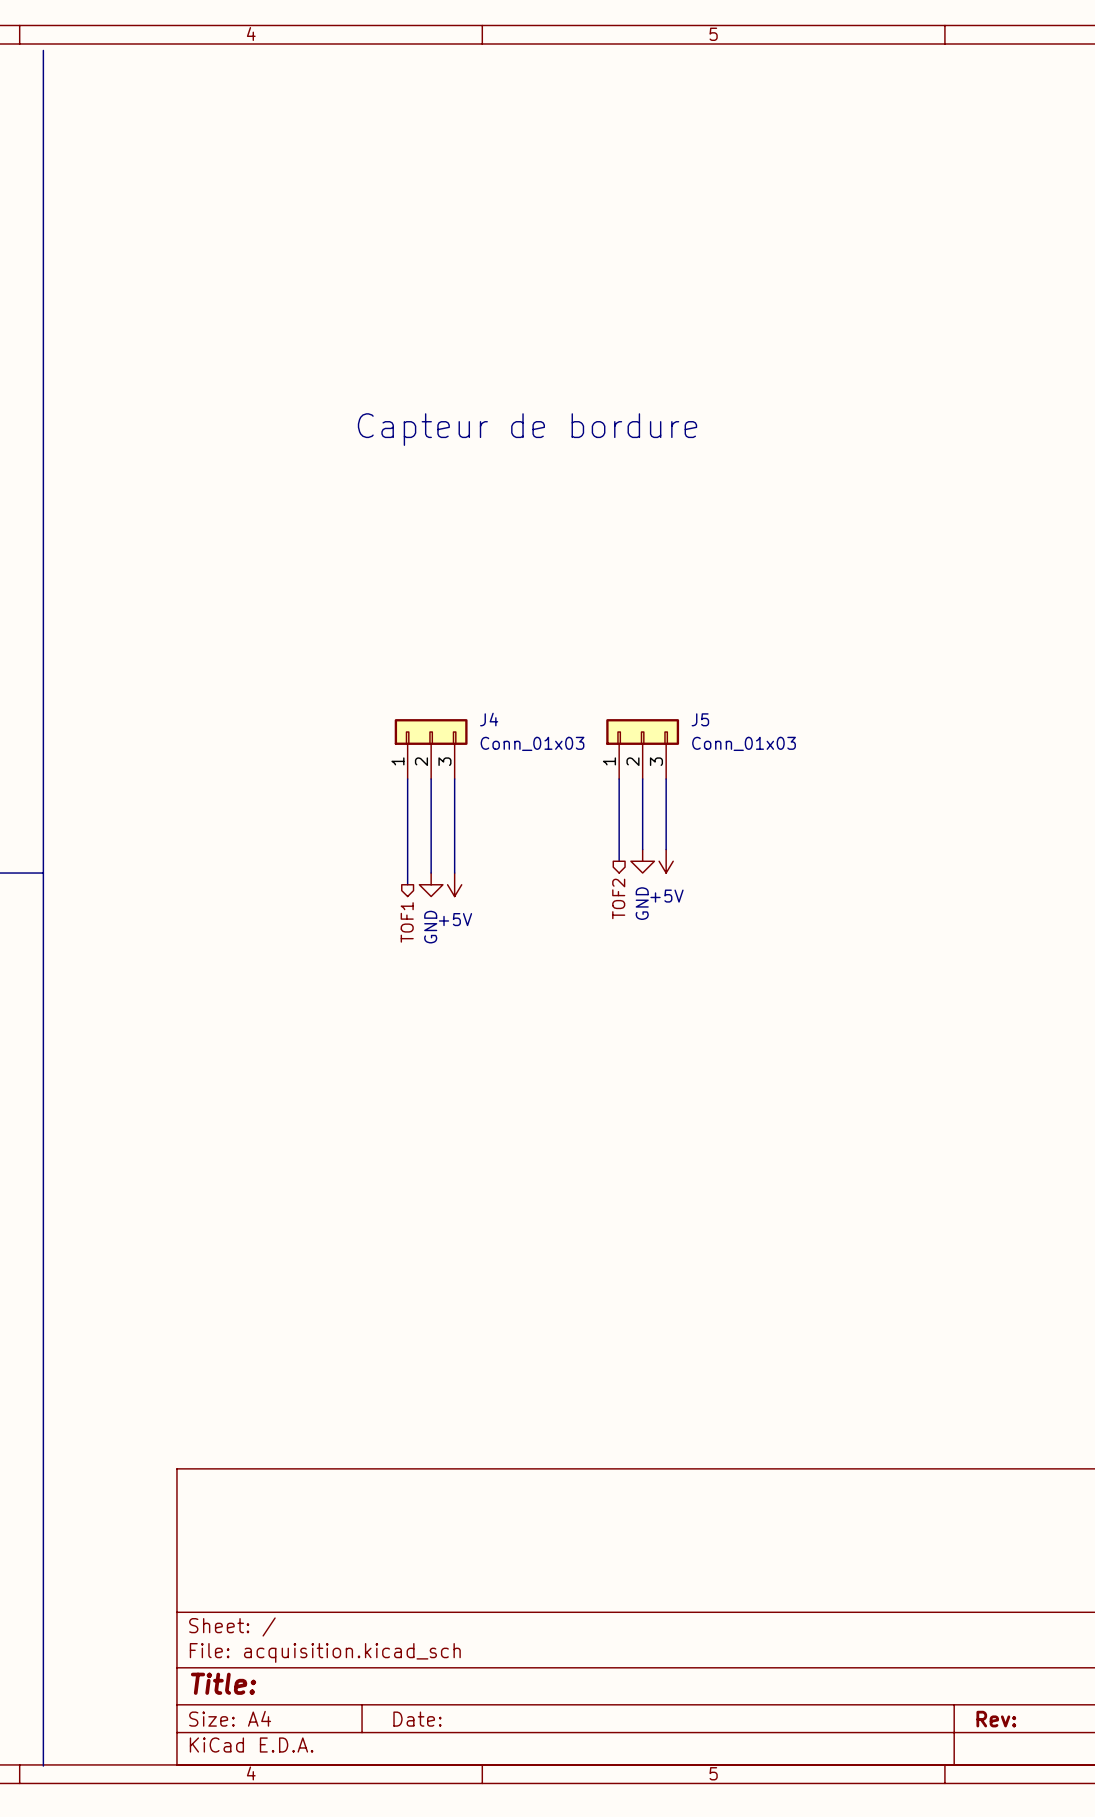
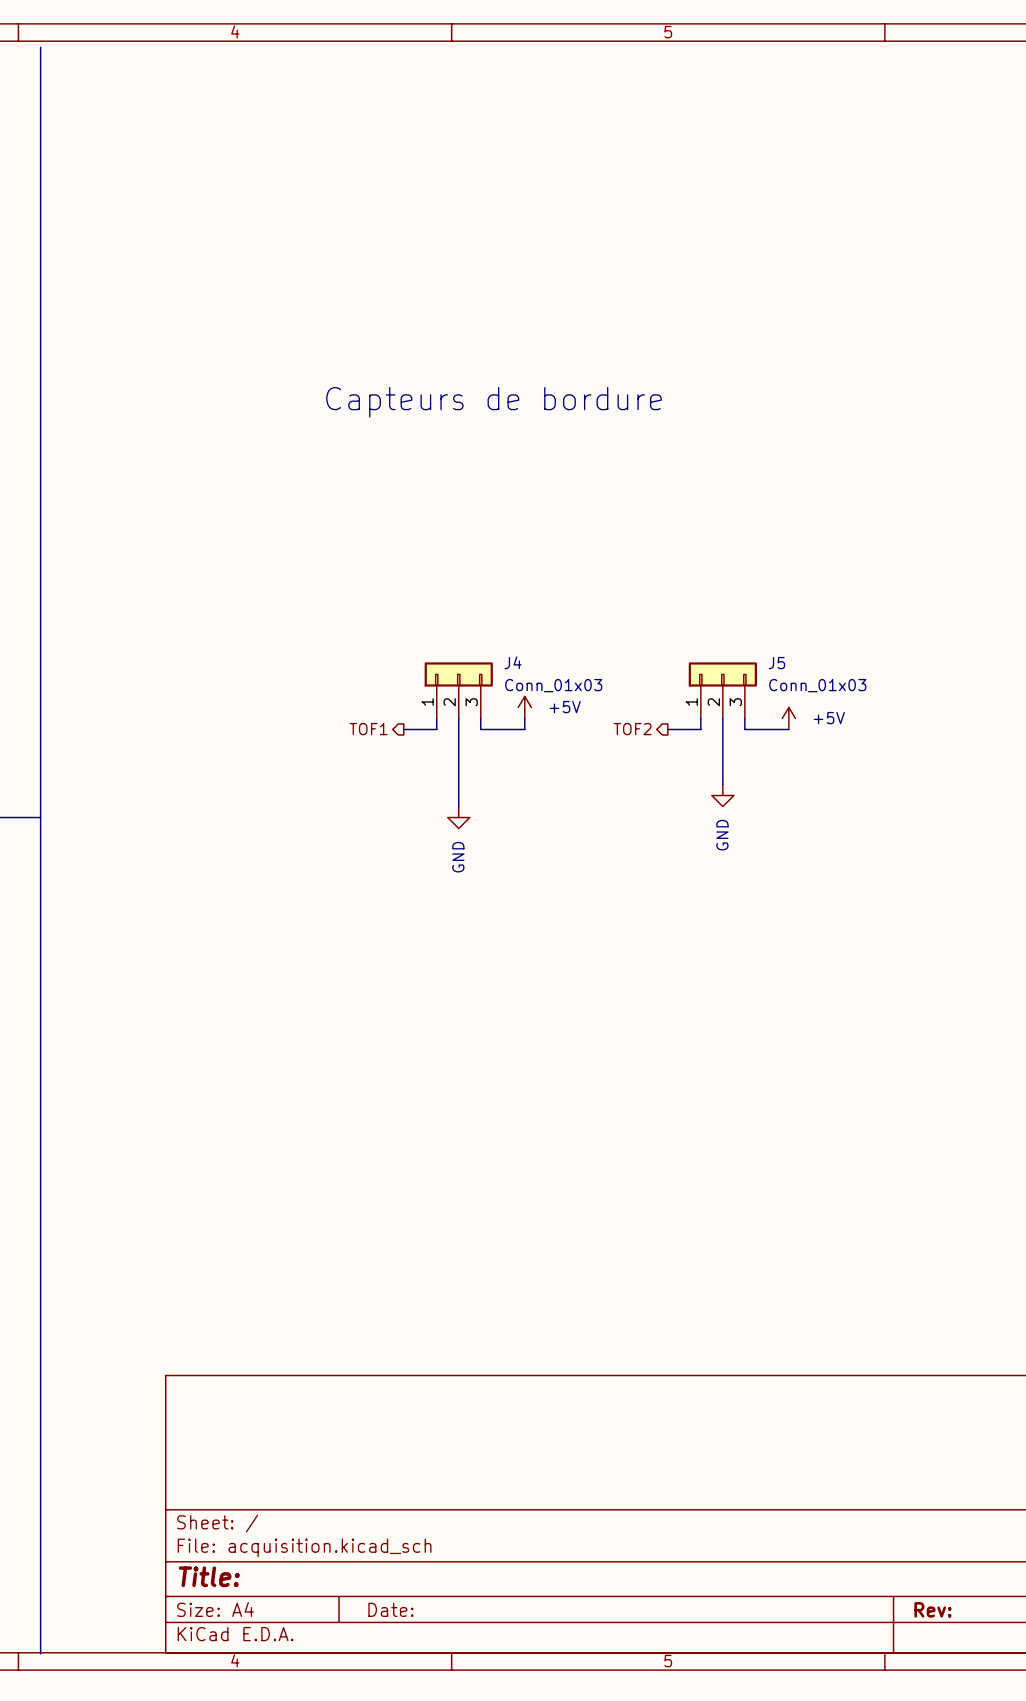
text: Capteur de bordure (527, 429) -> Capteurs de bordure (493, 402)
J4 position: (431, 749) -> (458, 690)
J5 position: (642, 749) -> (722, 690)
power symbol: none -> +5V (524, 707)
wire: none -> (480, 718) (480, 729) (524, 729) (524, 718)
wire: none -> (700, 718) (700, 729) (667, 729)
wire: none -> (744, 718) (744, 729) (788, 729)
power symbol: none -> +5V (788, 718)
wire: (407, 779) (407, 884) -> none
wire: (431, 779) (431, 873) -> (403, 729) (436, 729) (436, 718)
wire: (454, 779) (454, 873) -> (458, 718) (458, 806)
wire: (619, 779) (619, 861) -> none
wire: (642, 779) (642, 849) -> none
wire: (666, 779) (666, 849) -> (722, 718) (722, 784)
power symbol: none -> GND (722, 795)
power symbol: GND (642, 861) -> none
power symbol: +5V (666, 861) -> none
power symbol position: GND (431, 884) -> GND (458, 817)
power symbol: +5V (454, 884) -> none
hierarchical label rotation: 0° (618, 898) -> 90° clockwise (632, 729)
hierarchical label position: TOF2 (618, 898) -> TOF2 (632, 729)
hierarchical label rotation: 0° (407, 922) -> 90° clockwise (368, 729)
hierarchical label position: TOF1 (407, 922) -> TOF1 (368, 729)

